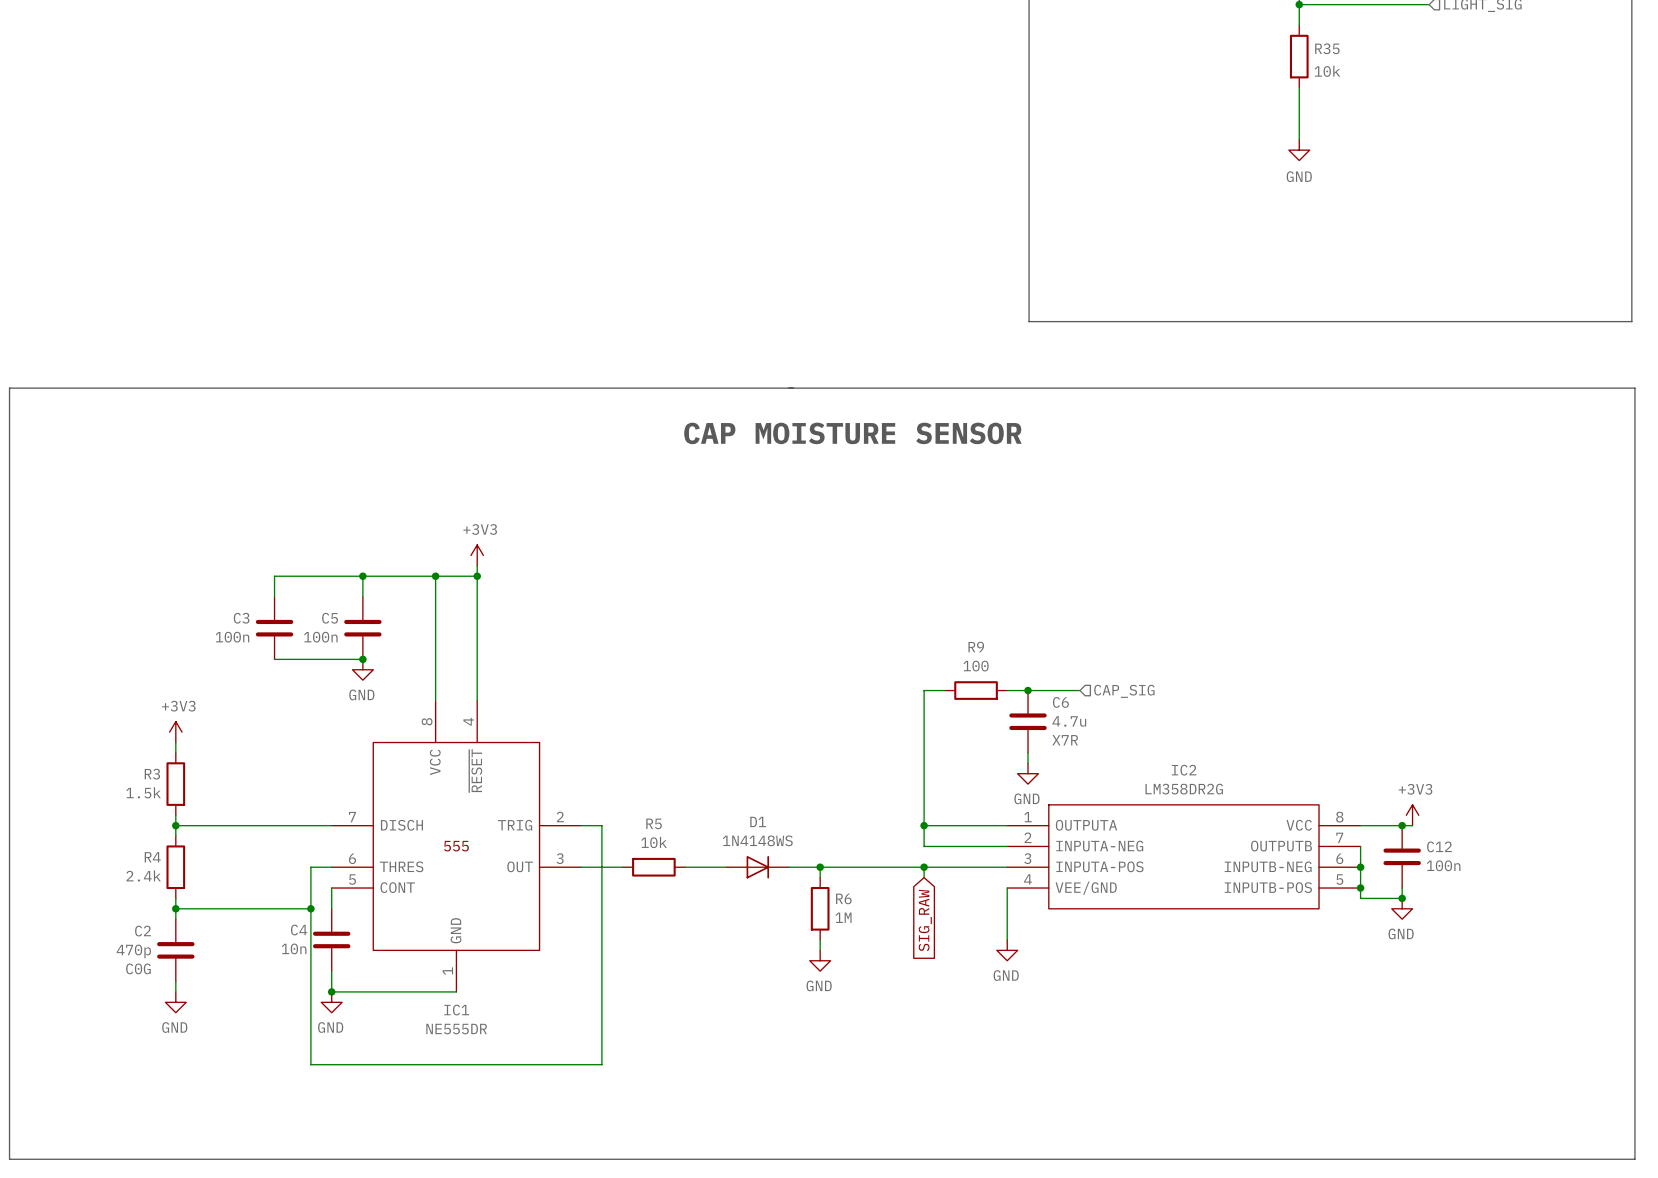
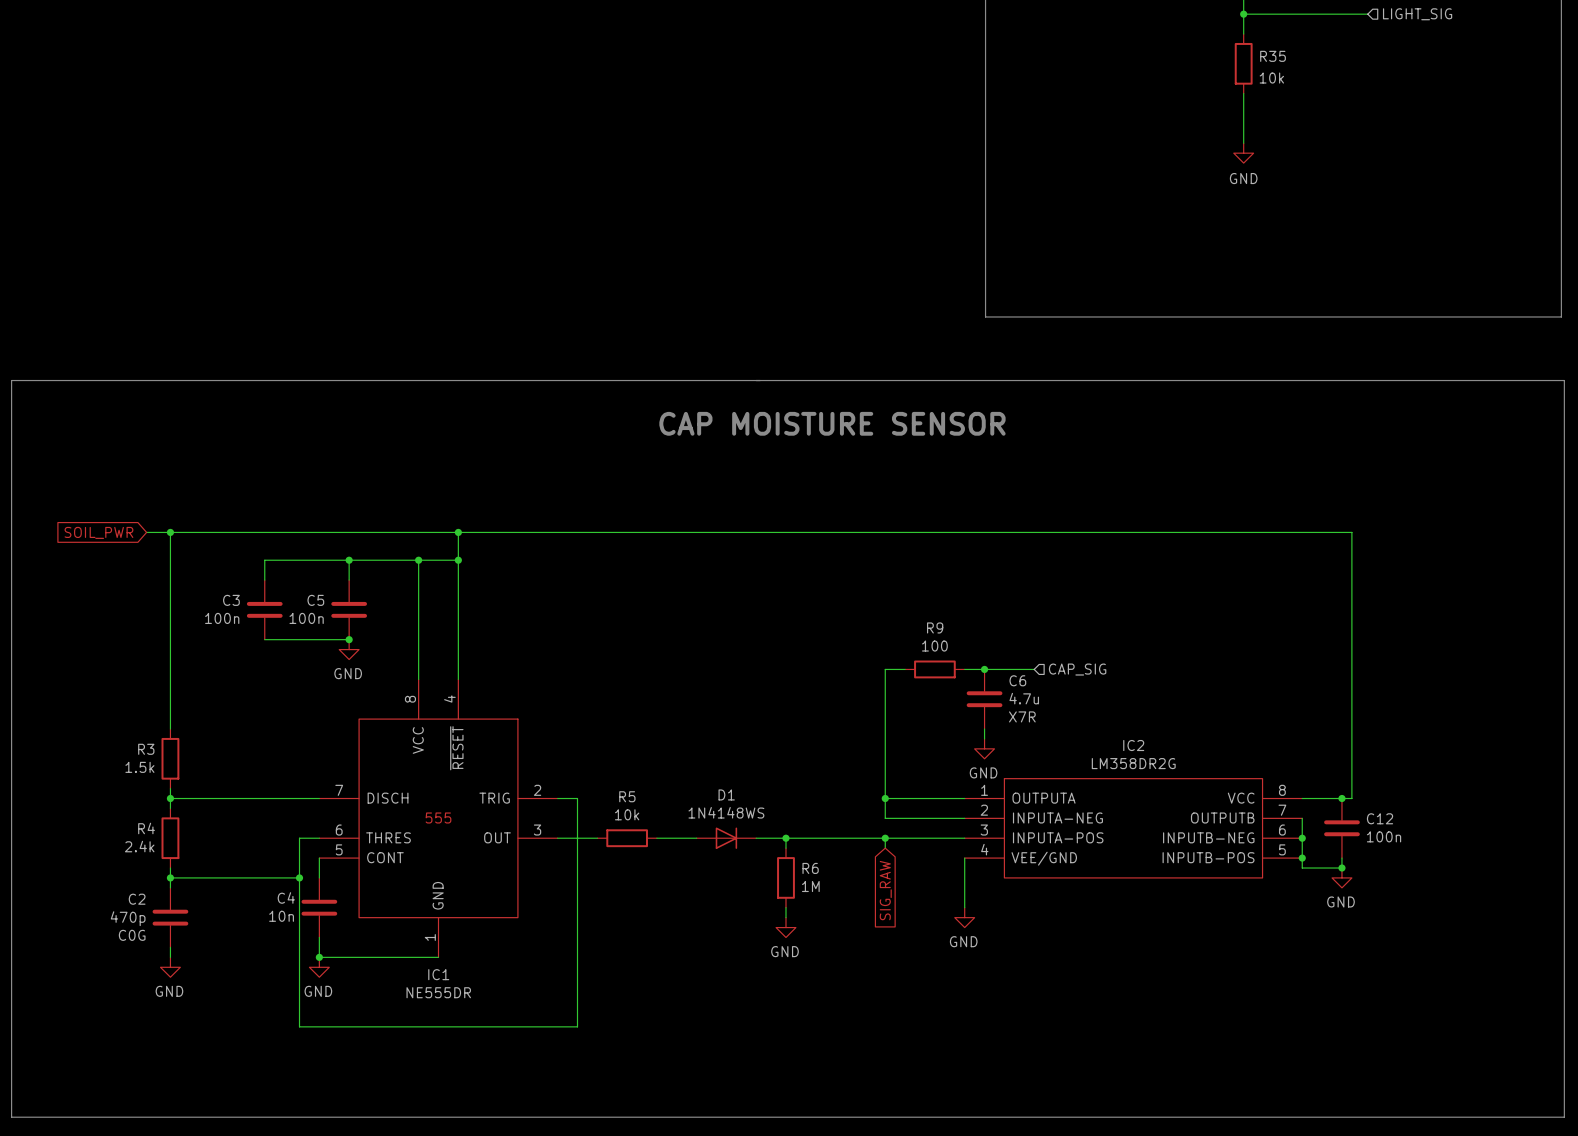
wire: none -> (146, 532) (1351, 532) (1351, 798)
wire: none -> (170, 532) (170, 719)
junction: none -> (170, 532)
junction: none -> (458, 532)
global label: none -> SOIL_PWR (98, 532)
power symbol: +3V3 (477, 555) -> none
power symbol: +3V3 (175, 732) -> none
power symbol: +3V3 (1412, 815) -> none

